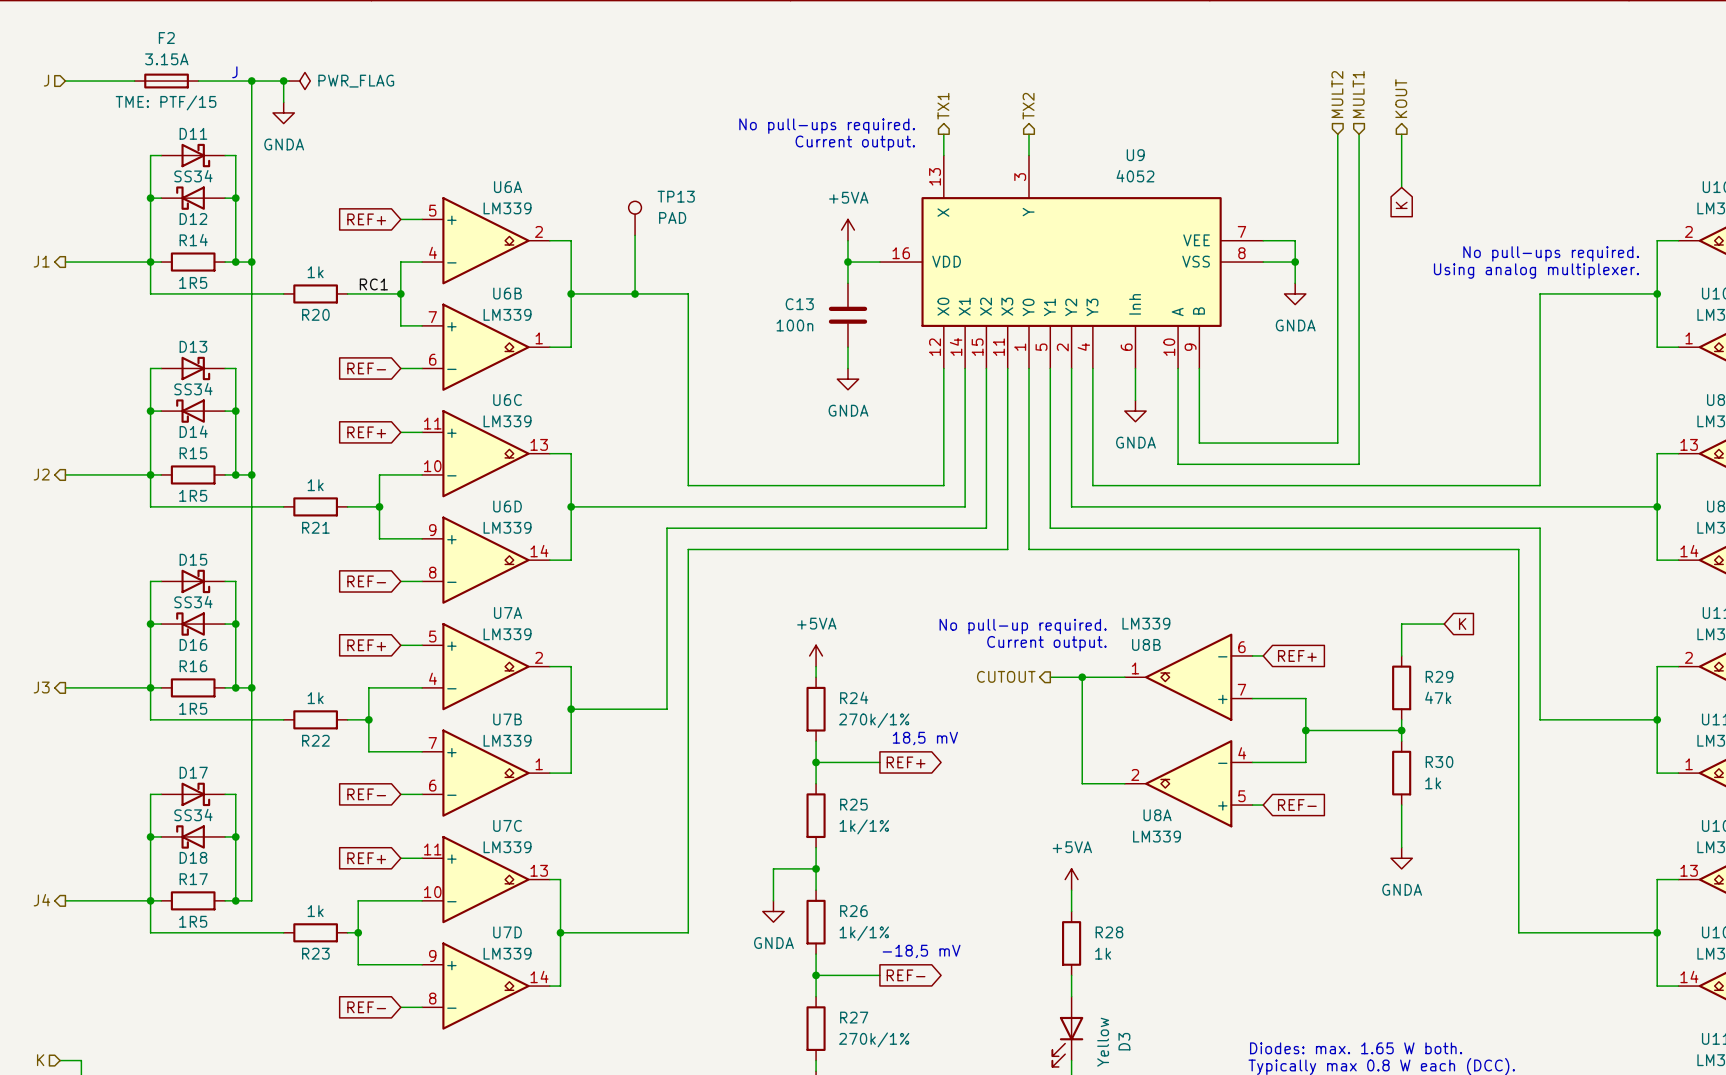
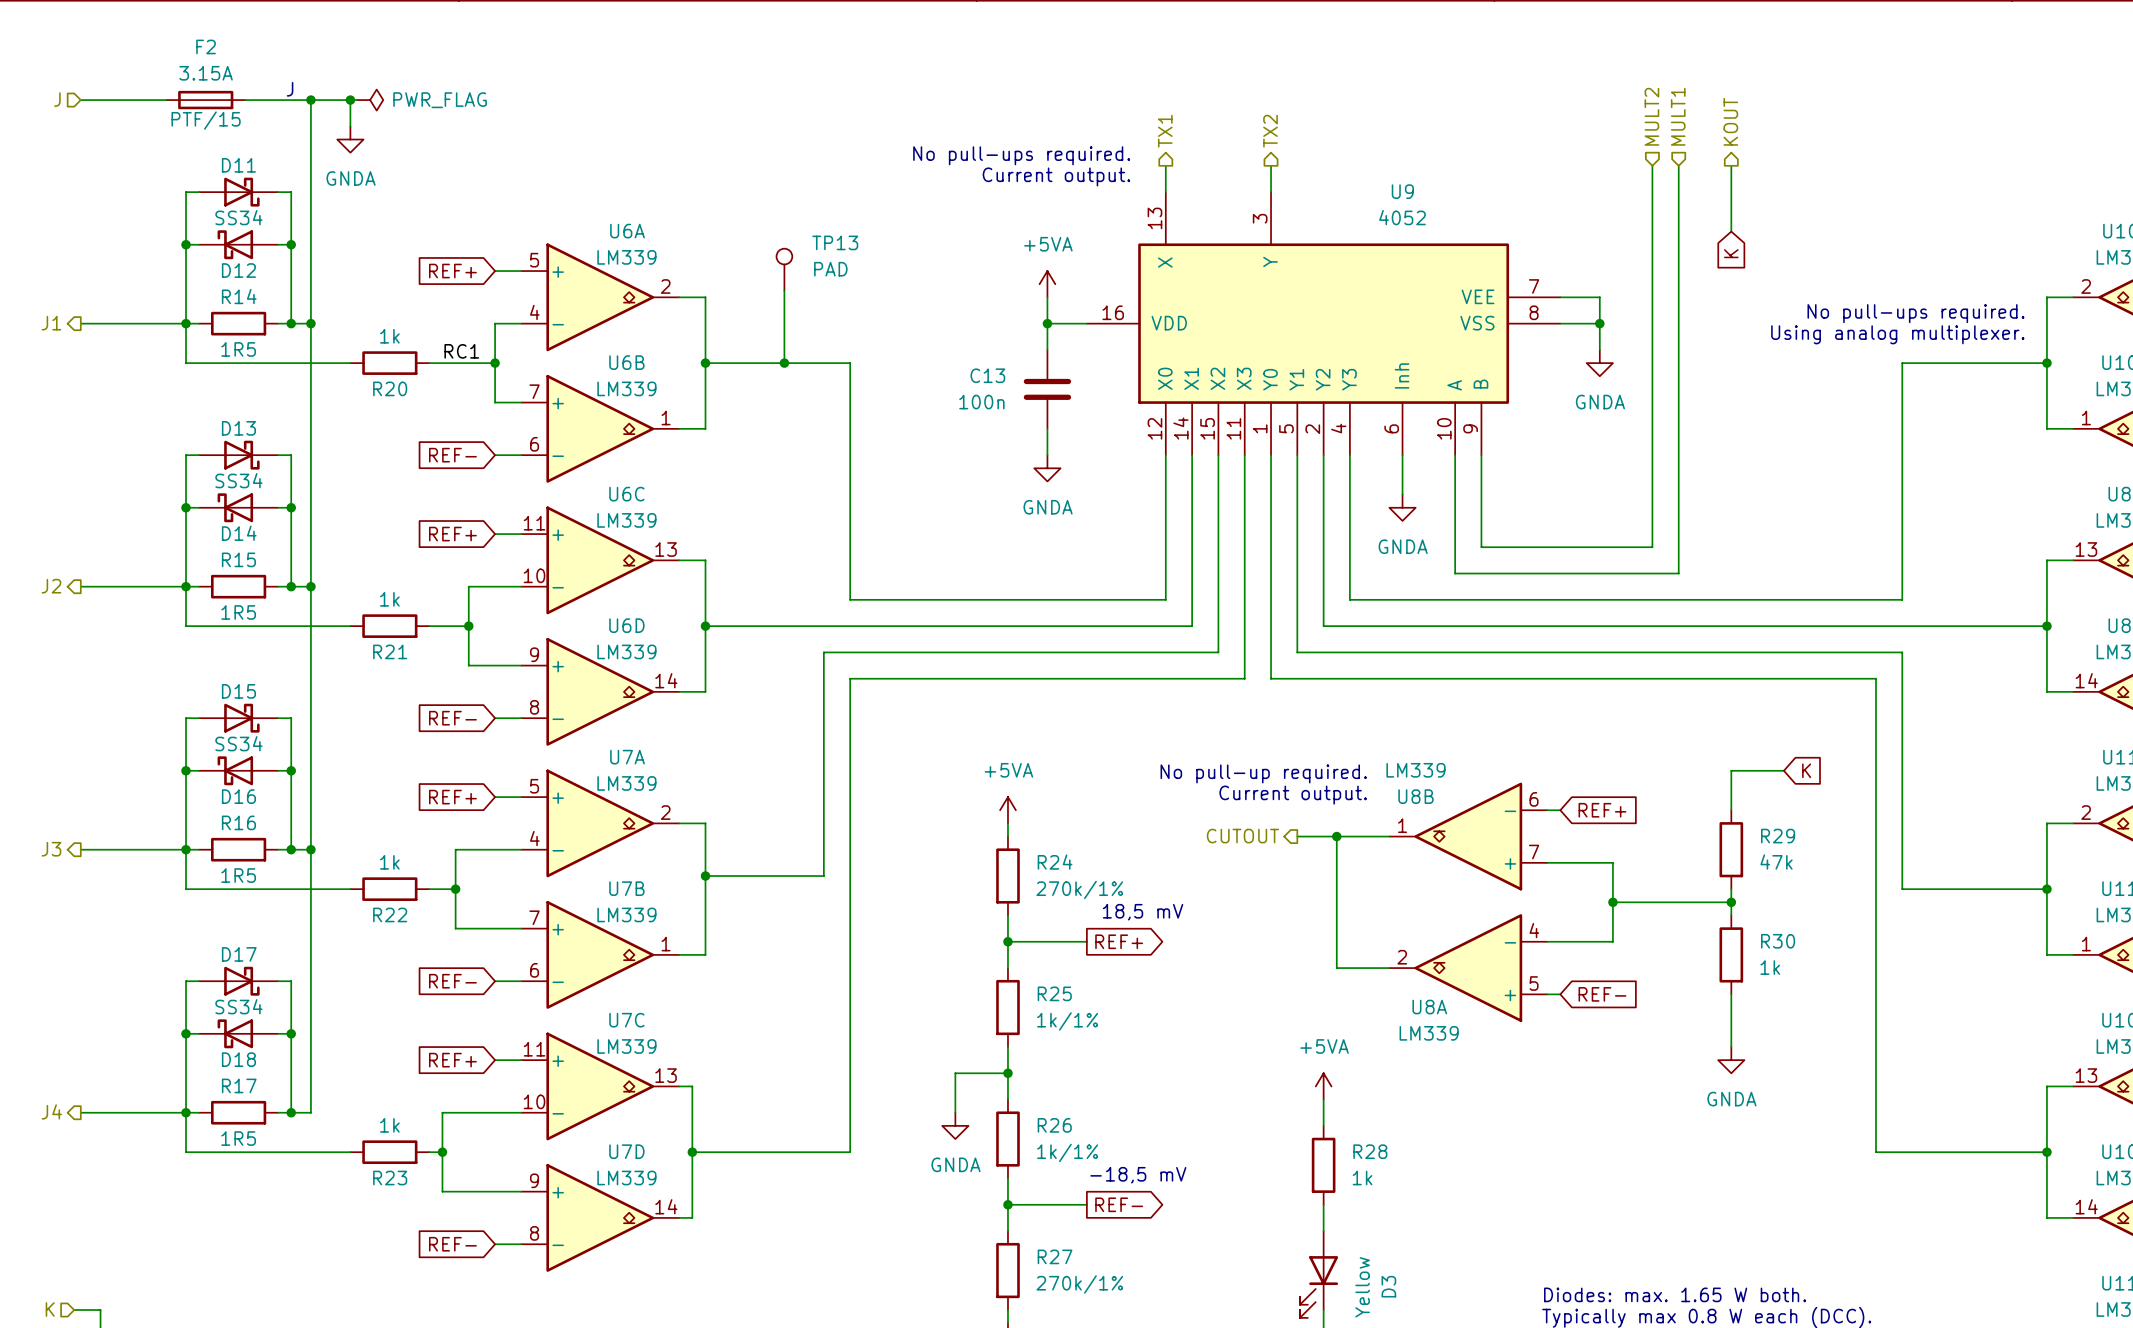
F2 text: none -> PTF/15 (206, 120)
F2 text: TME: PTF/15 (166, 102) -> none

